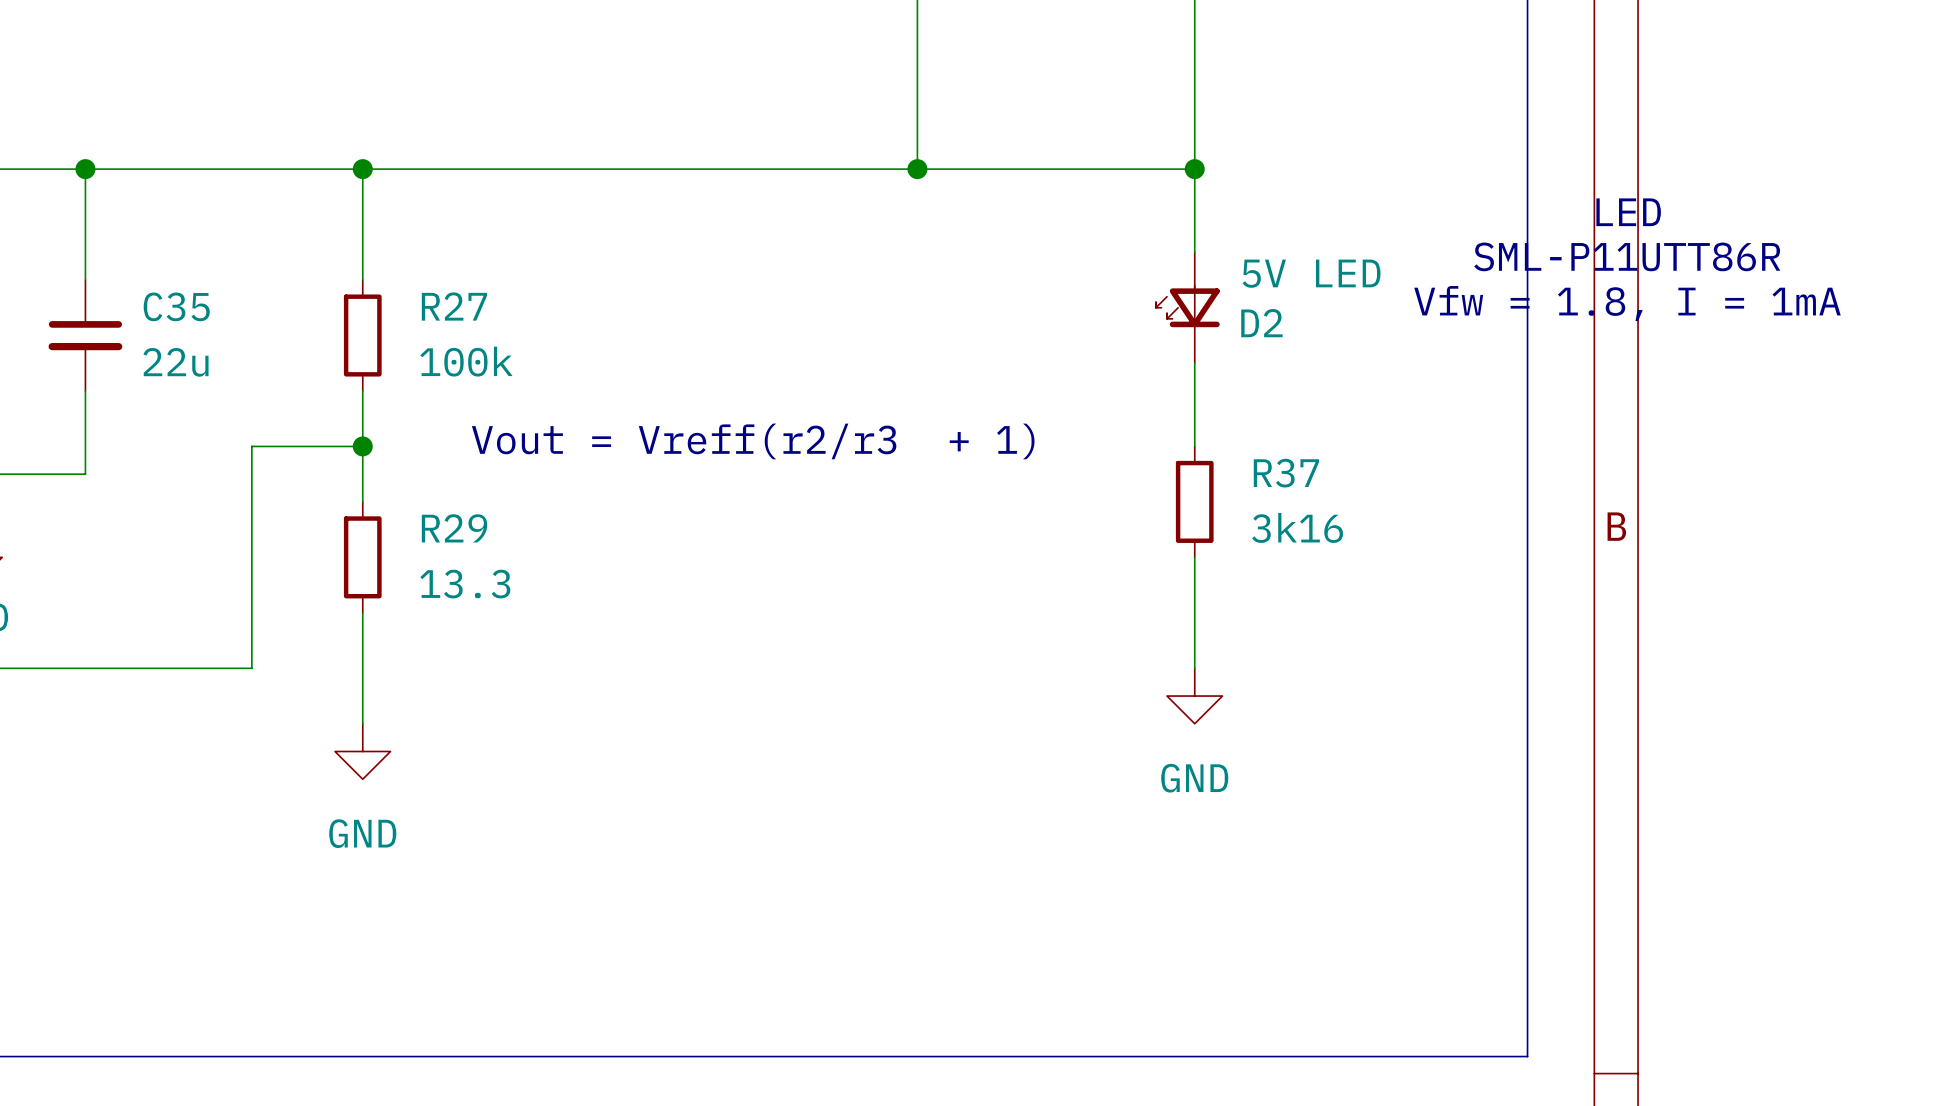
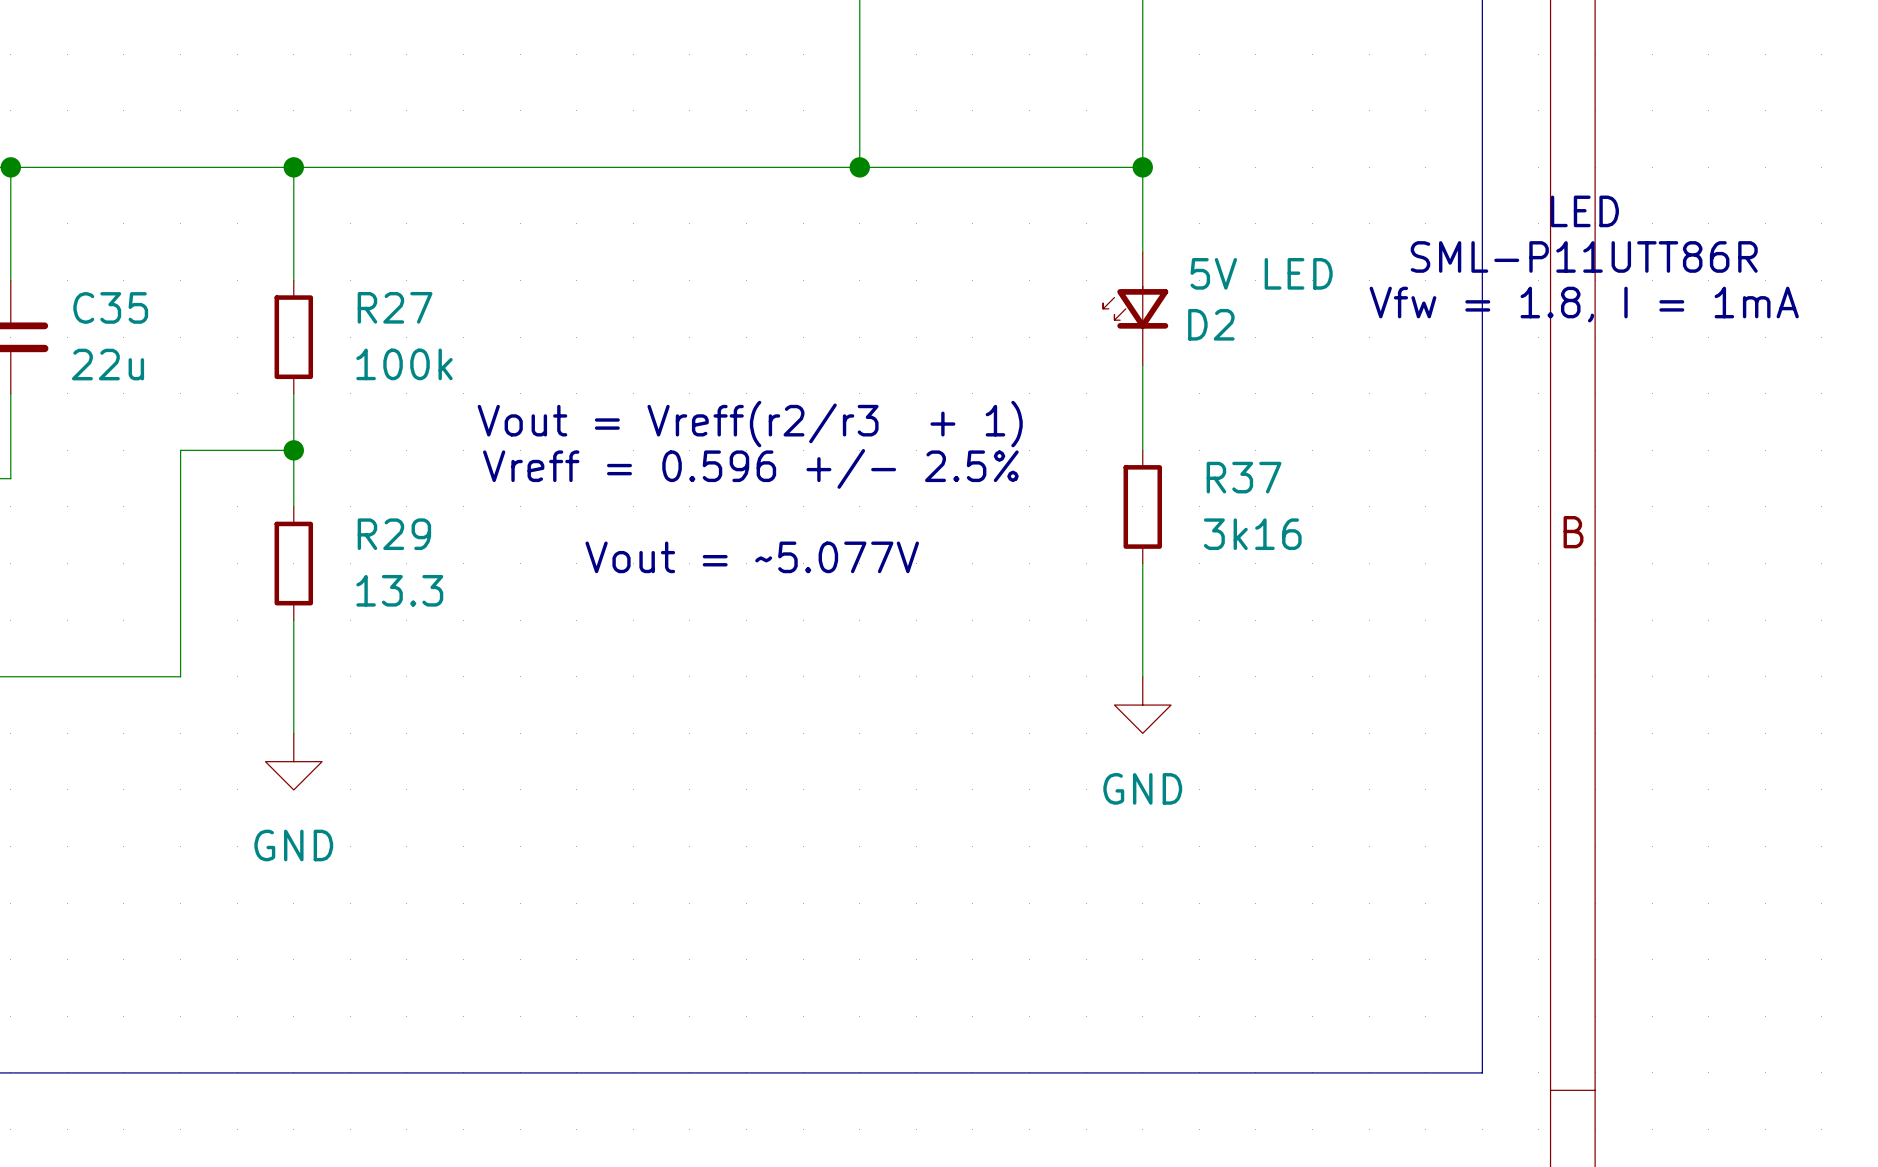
text position: Vout = Vreff(r2/r3 + 1) (753, 441) -> Vout = Vreff(r2/r3 + 1) (750, 424)
text: none -> Vreff = 0.596 +/- 2.5% (750, 468)
text: none -> Vout = ~5.077V (752, 557)

